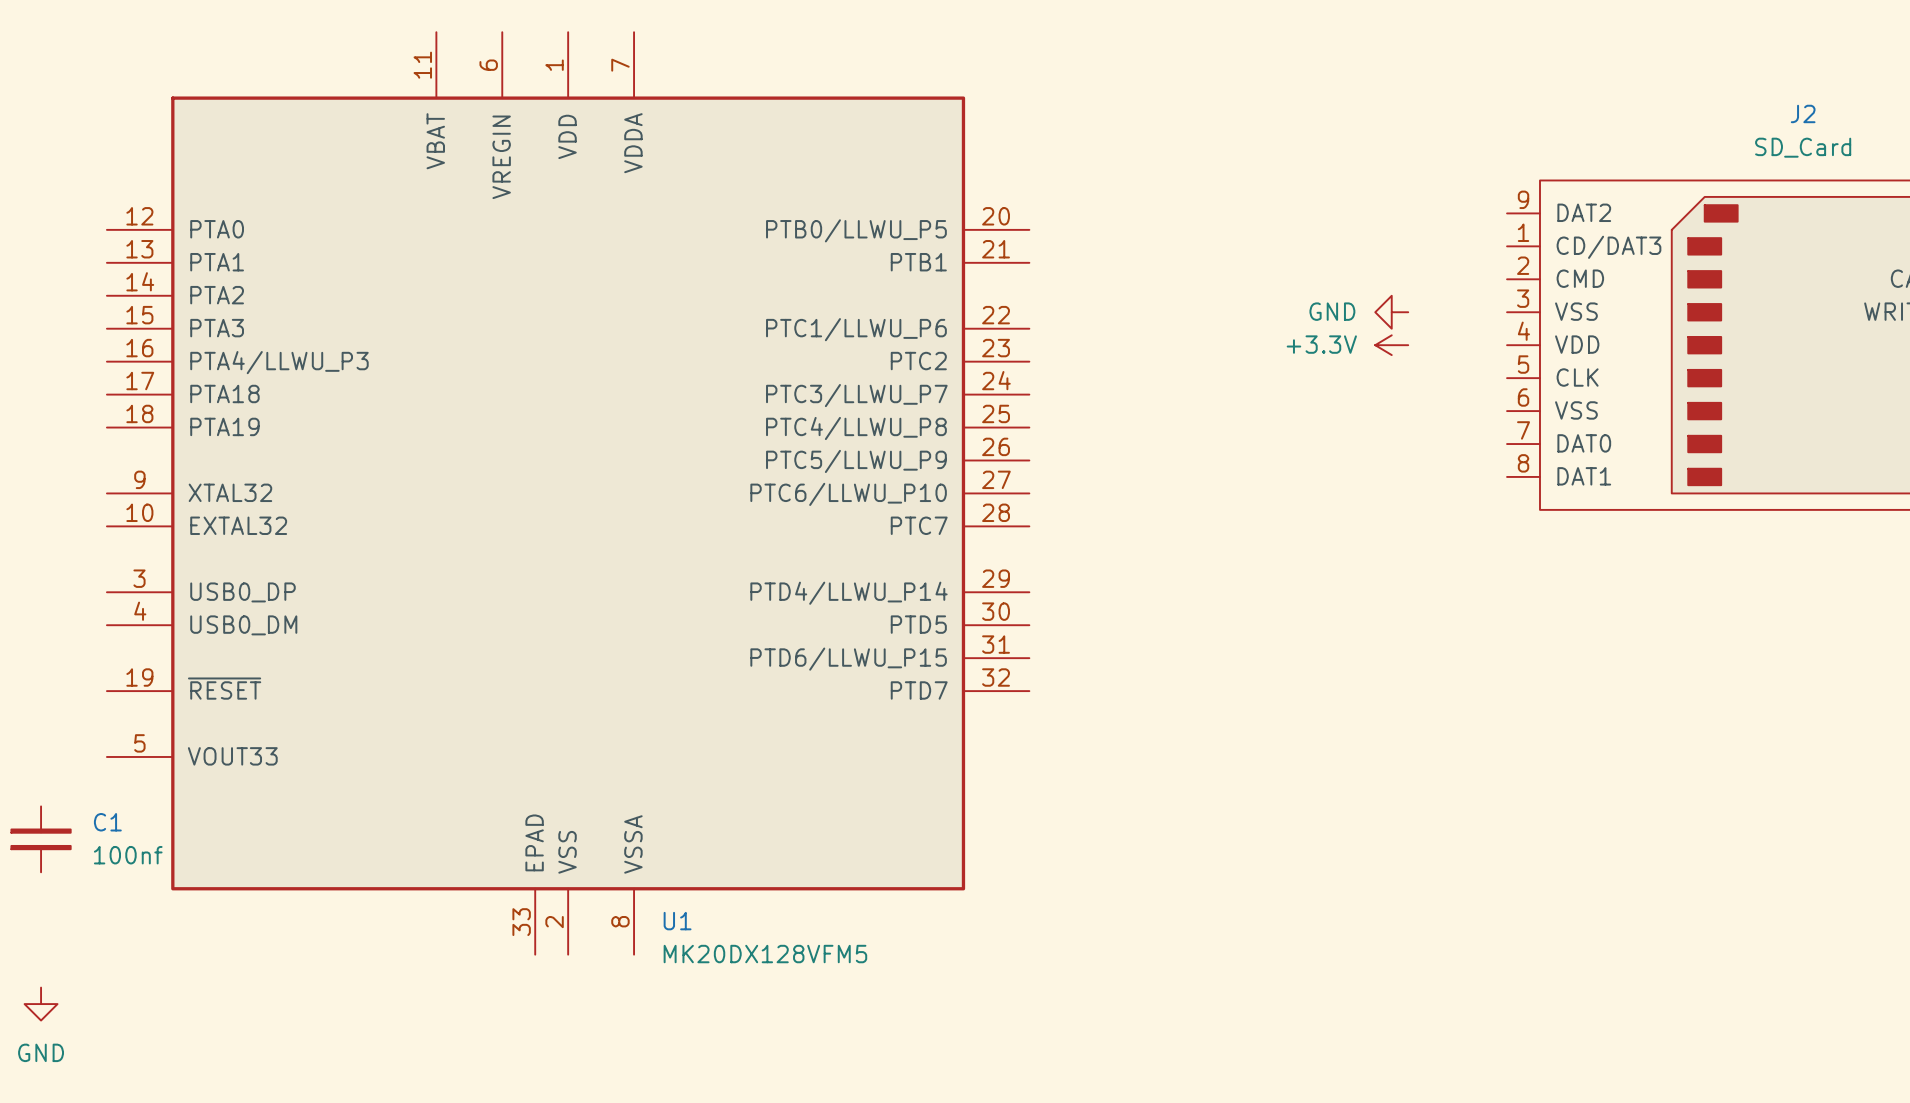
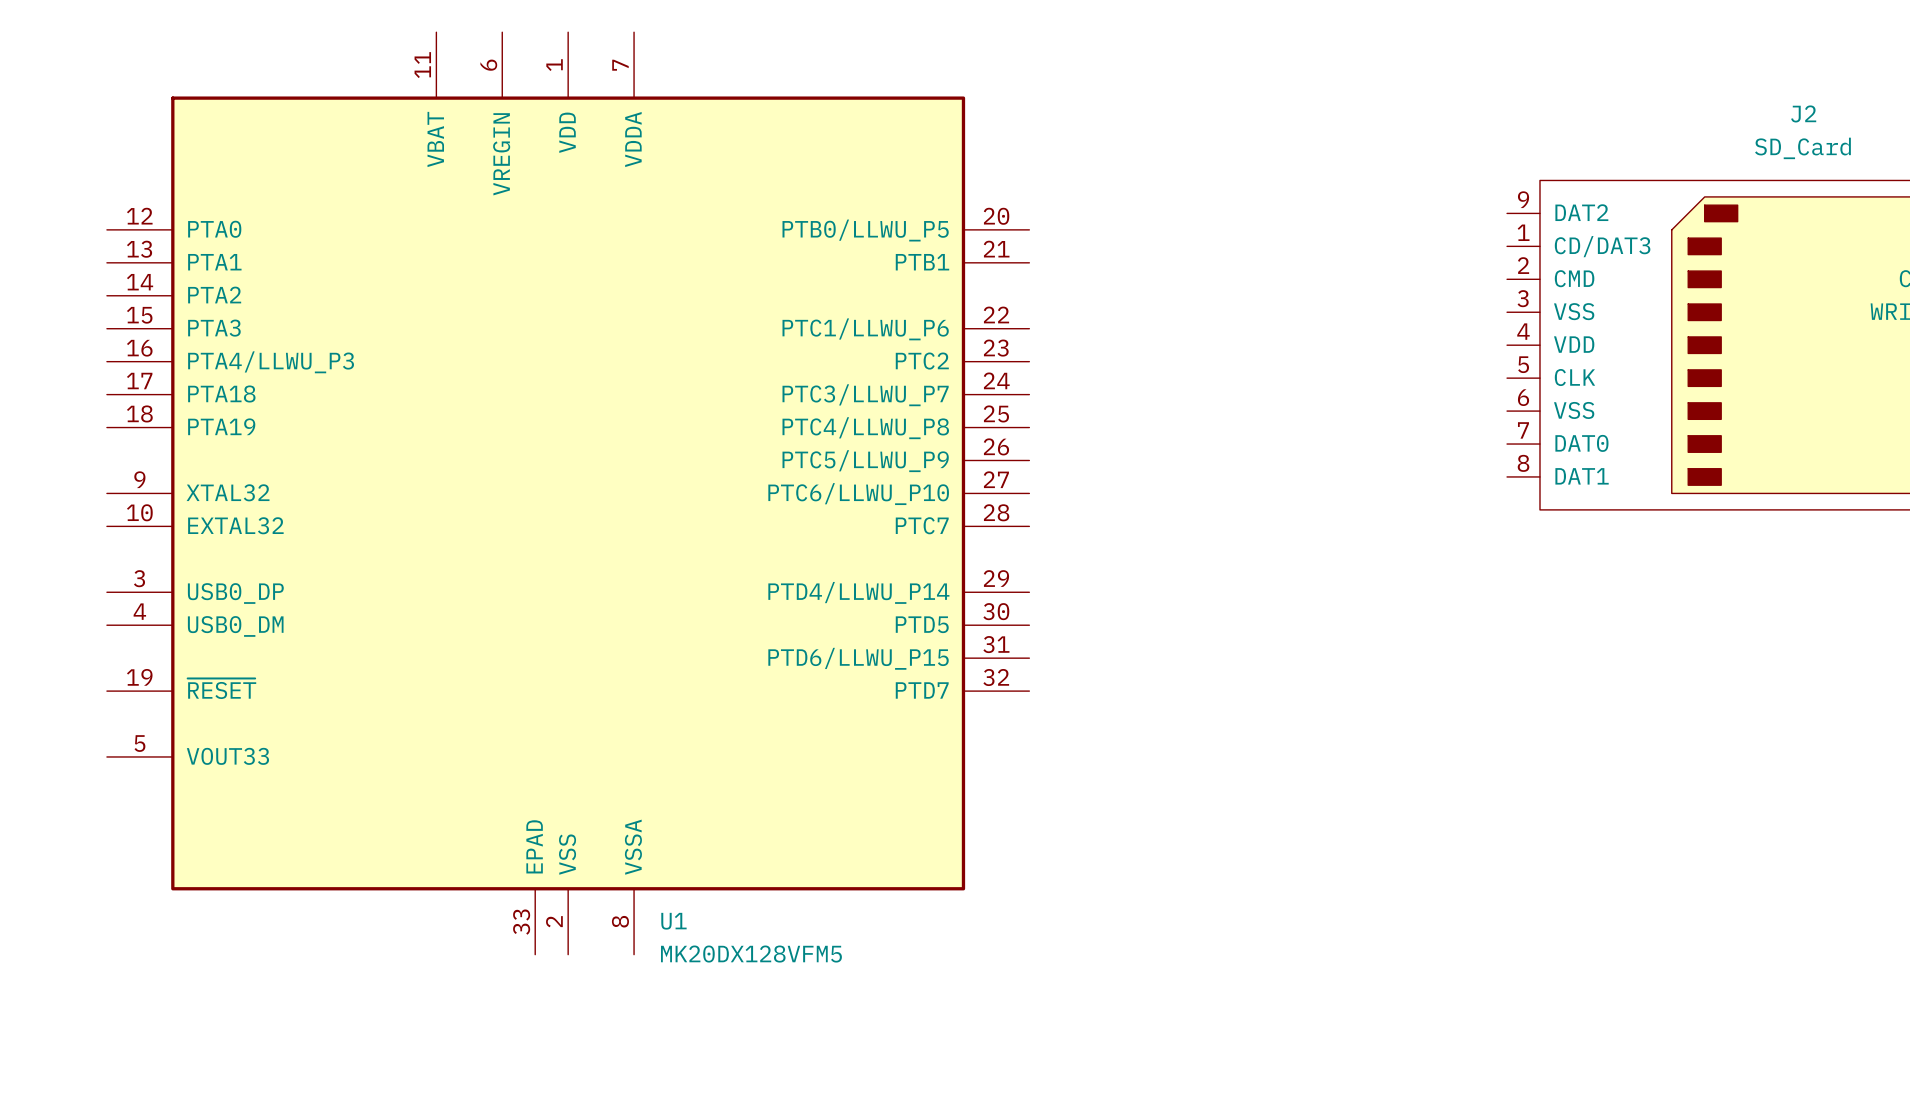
power symbol: GND (1391, 312) -> none
power symbol: +3.3V (1391, 345) -> none
C1: 100nf (41, 839) -> none
power symbol: GND (41, 1004) -> none

